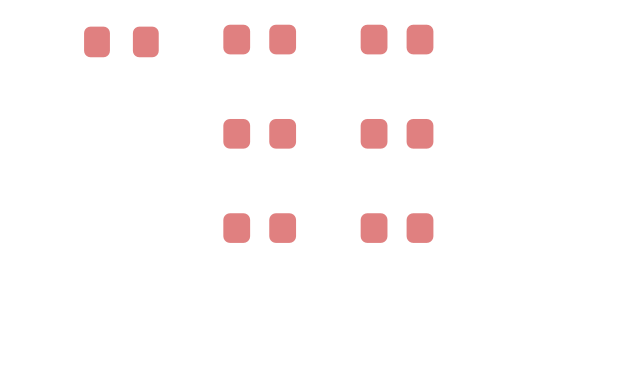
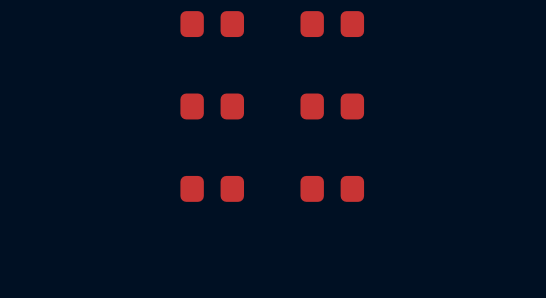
part: (121, 41) -> none

